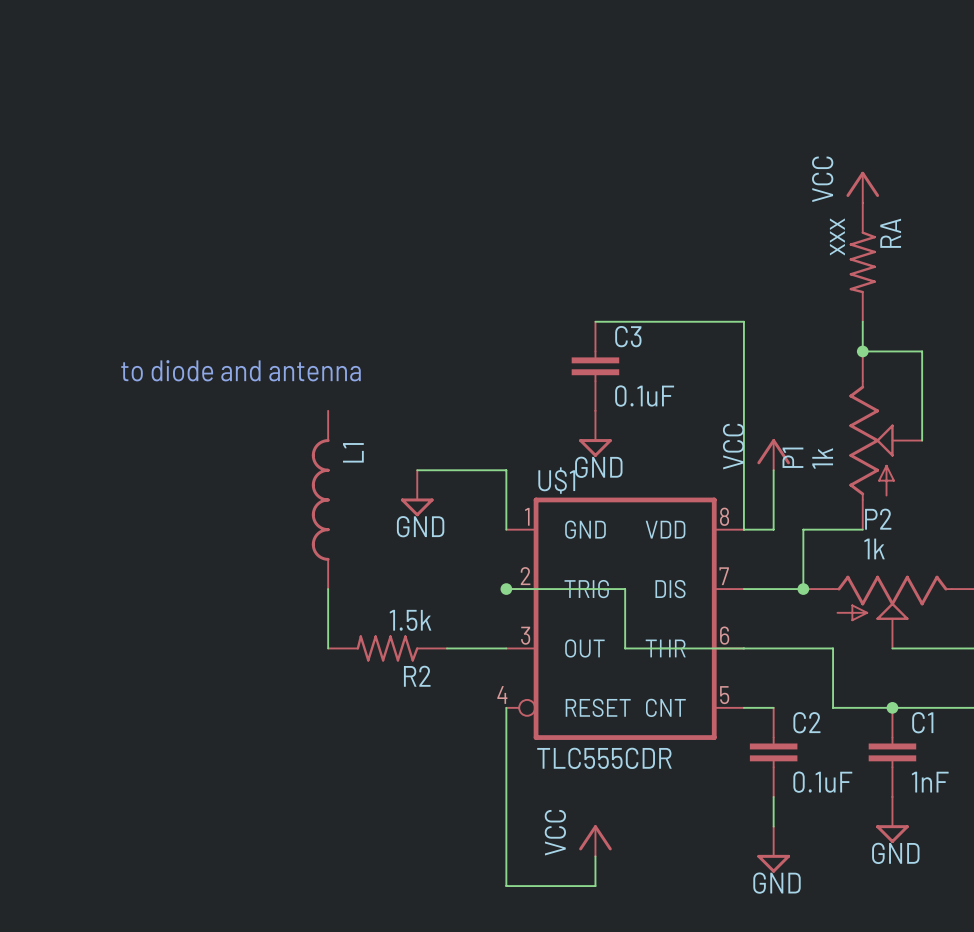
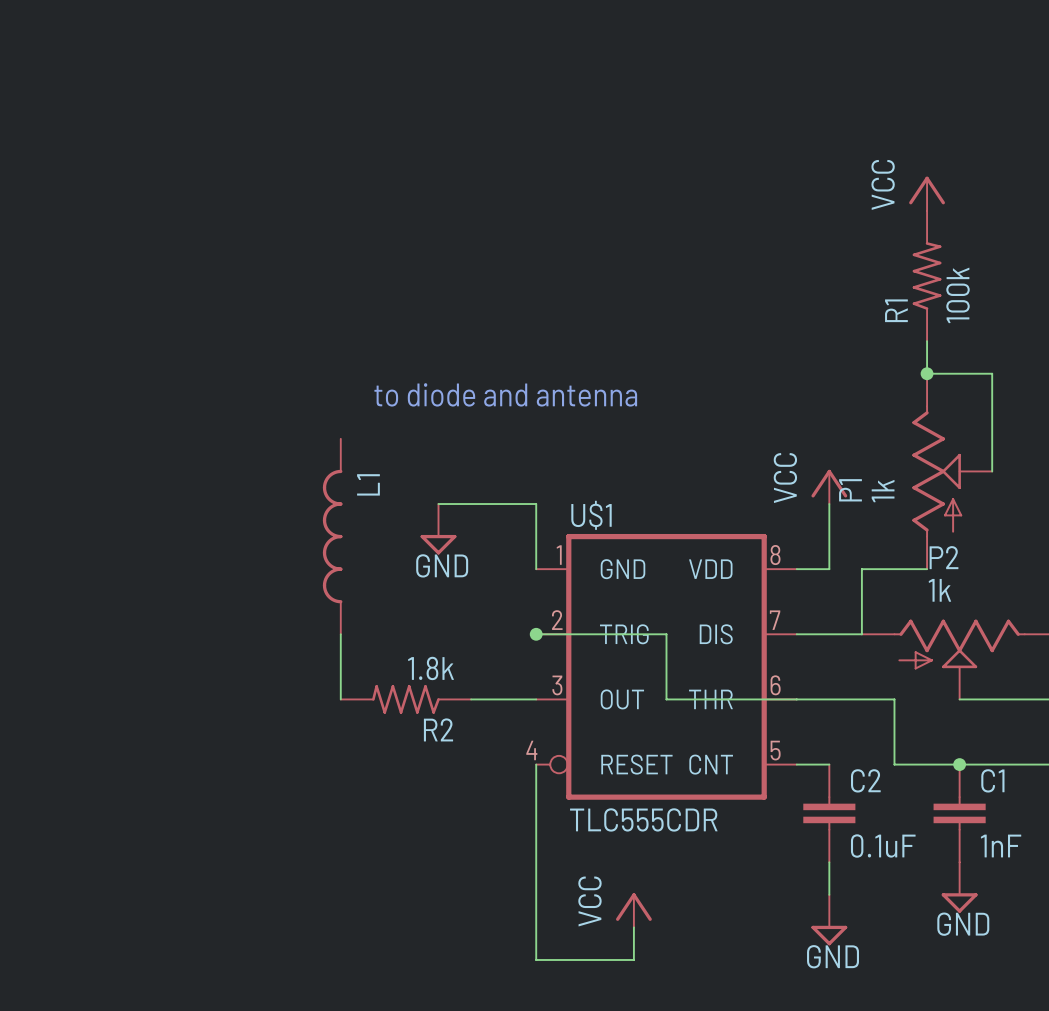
RA: xxx (862, 262) -> none
R1: none -> 100k (927, 276)
wire: (595, 321) (743, 321) (743, 529) -> none
C3: 0.1uF (595, 366) -> none
text position: to diode and antenna (240, 370) -> to diode and antenna (505, 394)
power symbol: GND (595, 433) -> none
junction: (803, 589) -> none
R2 value: 1.5k (410, 620) -> 1.8k (431, 668)

